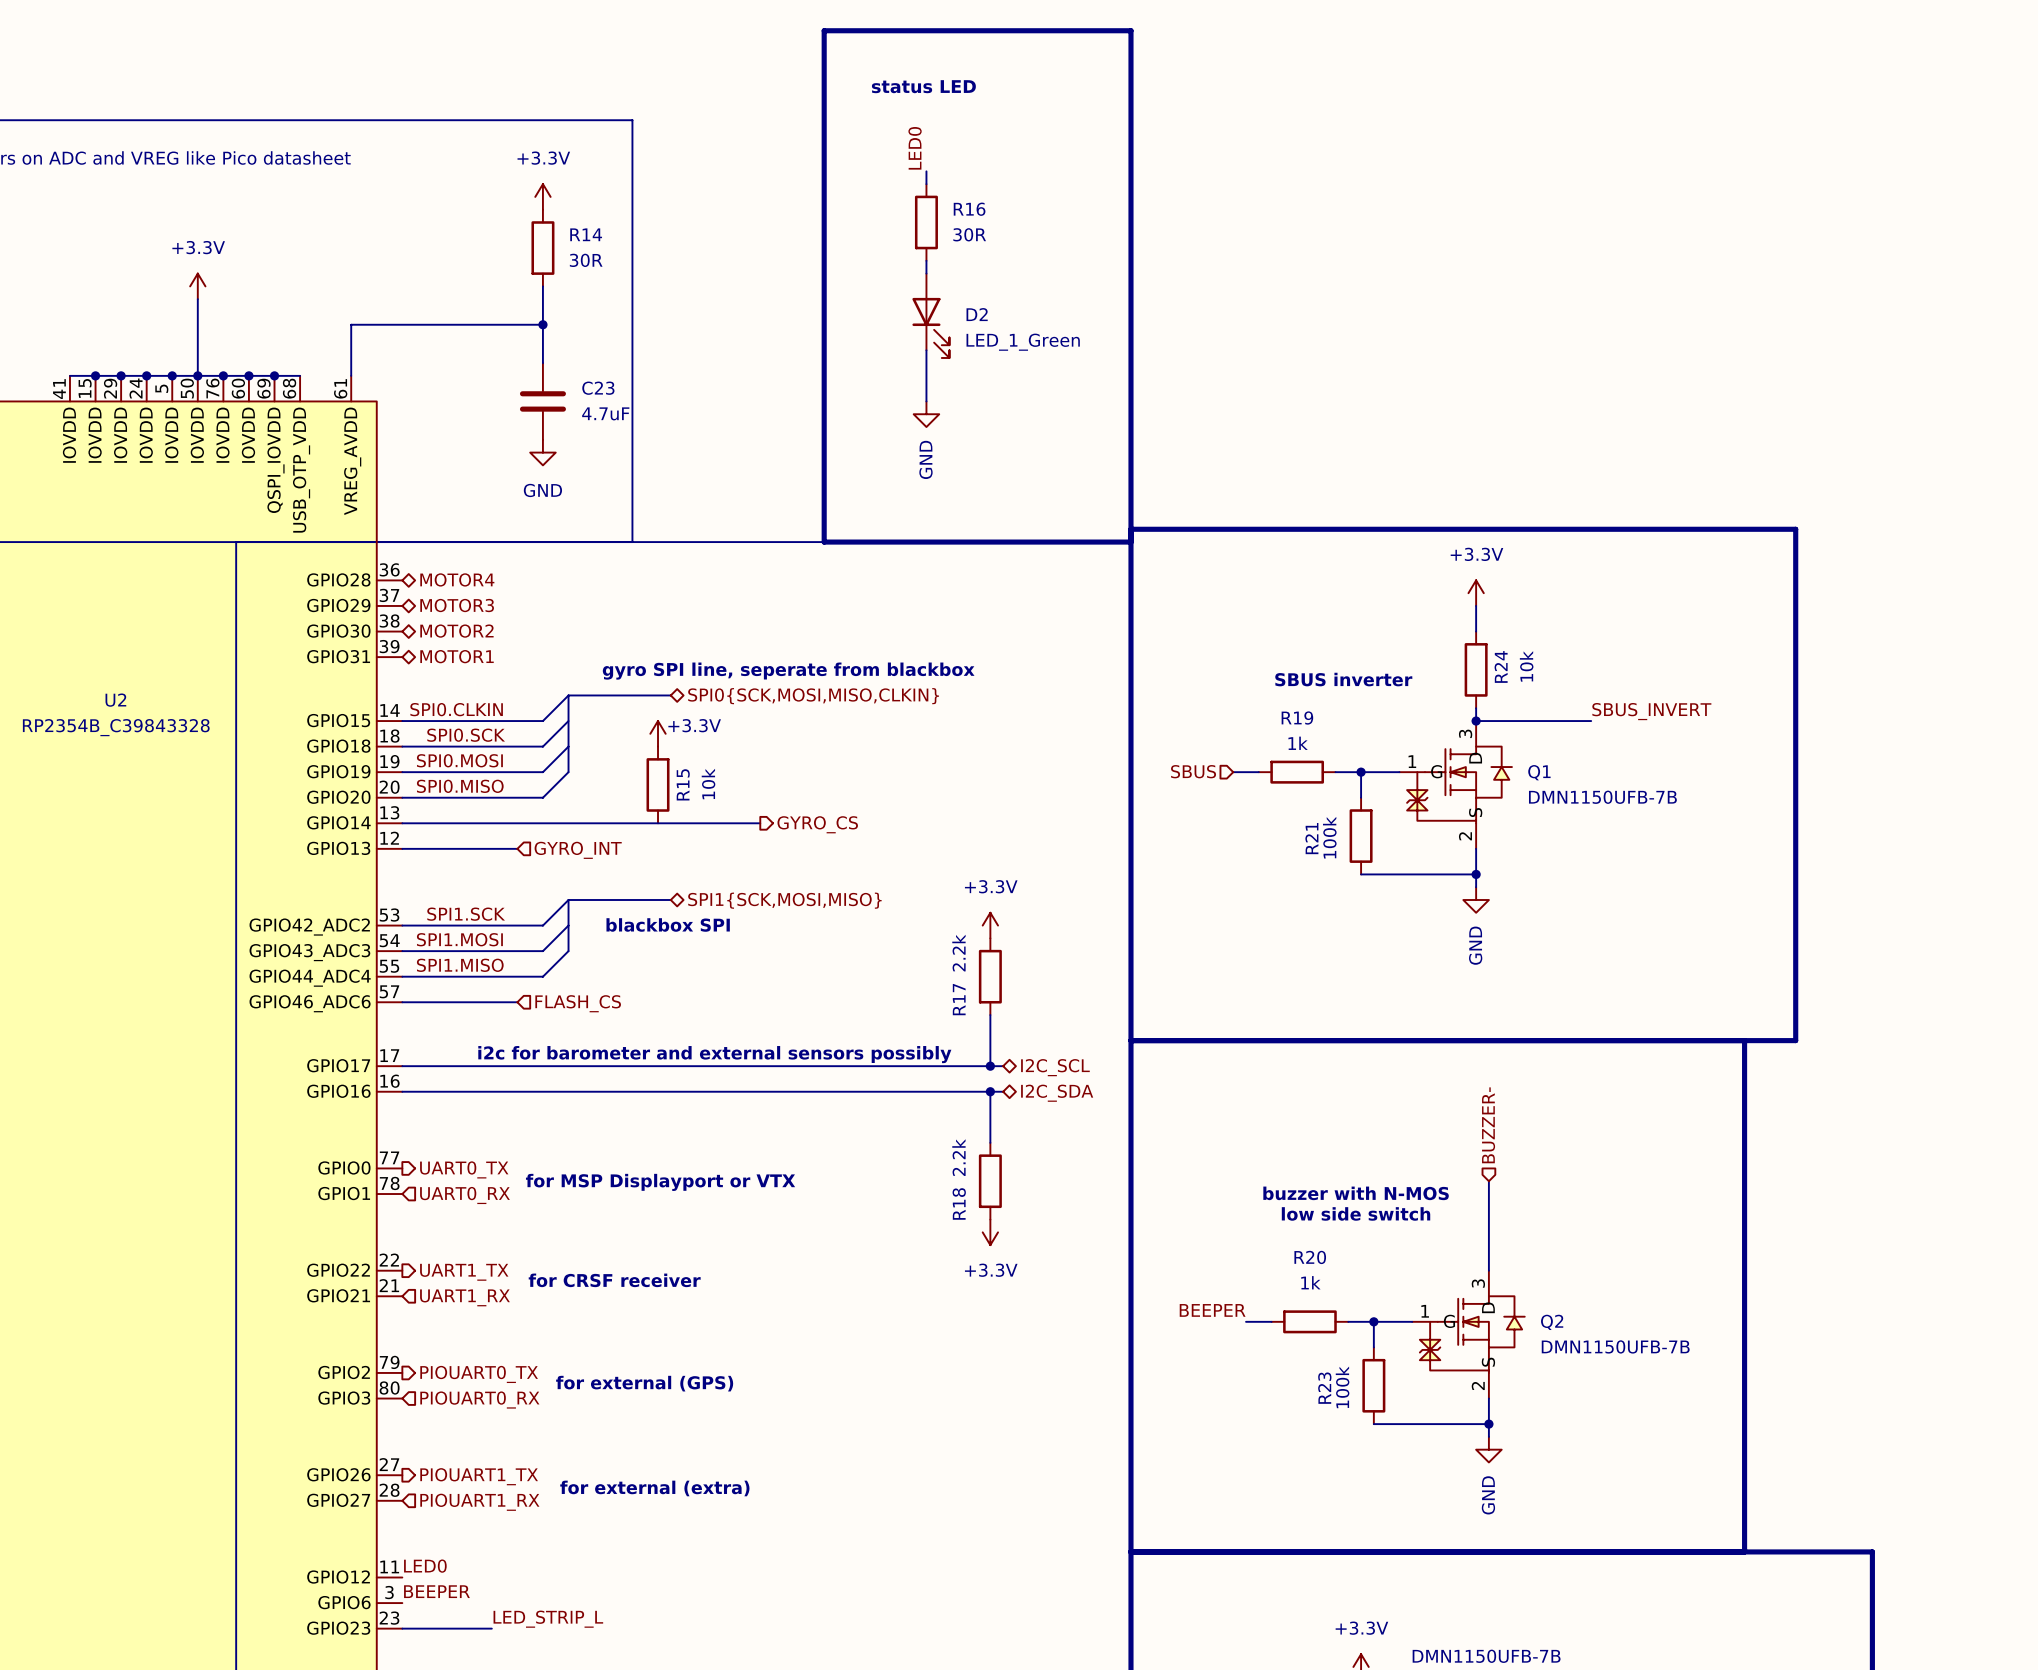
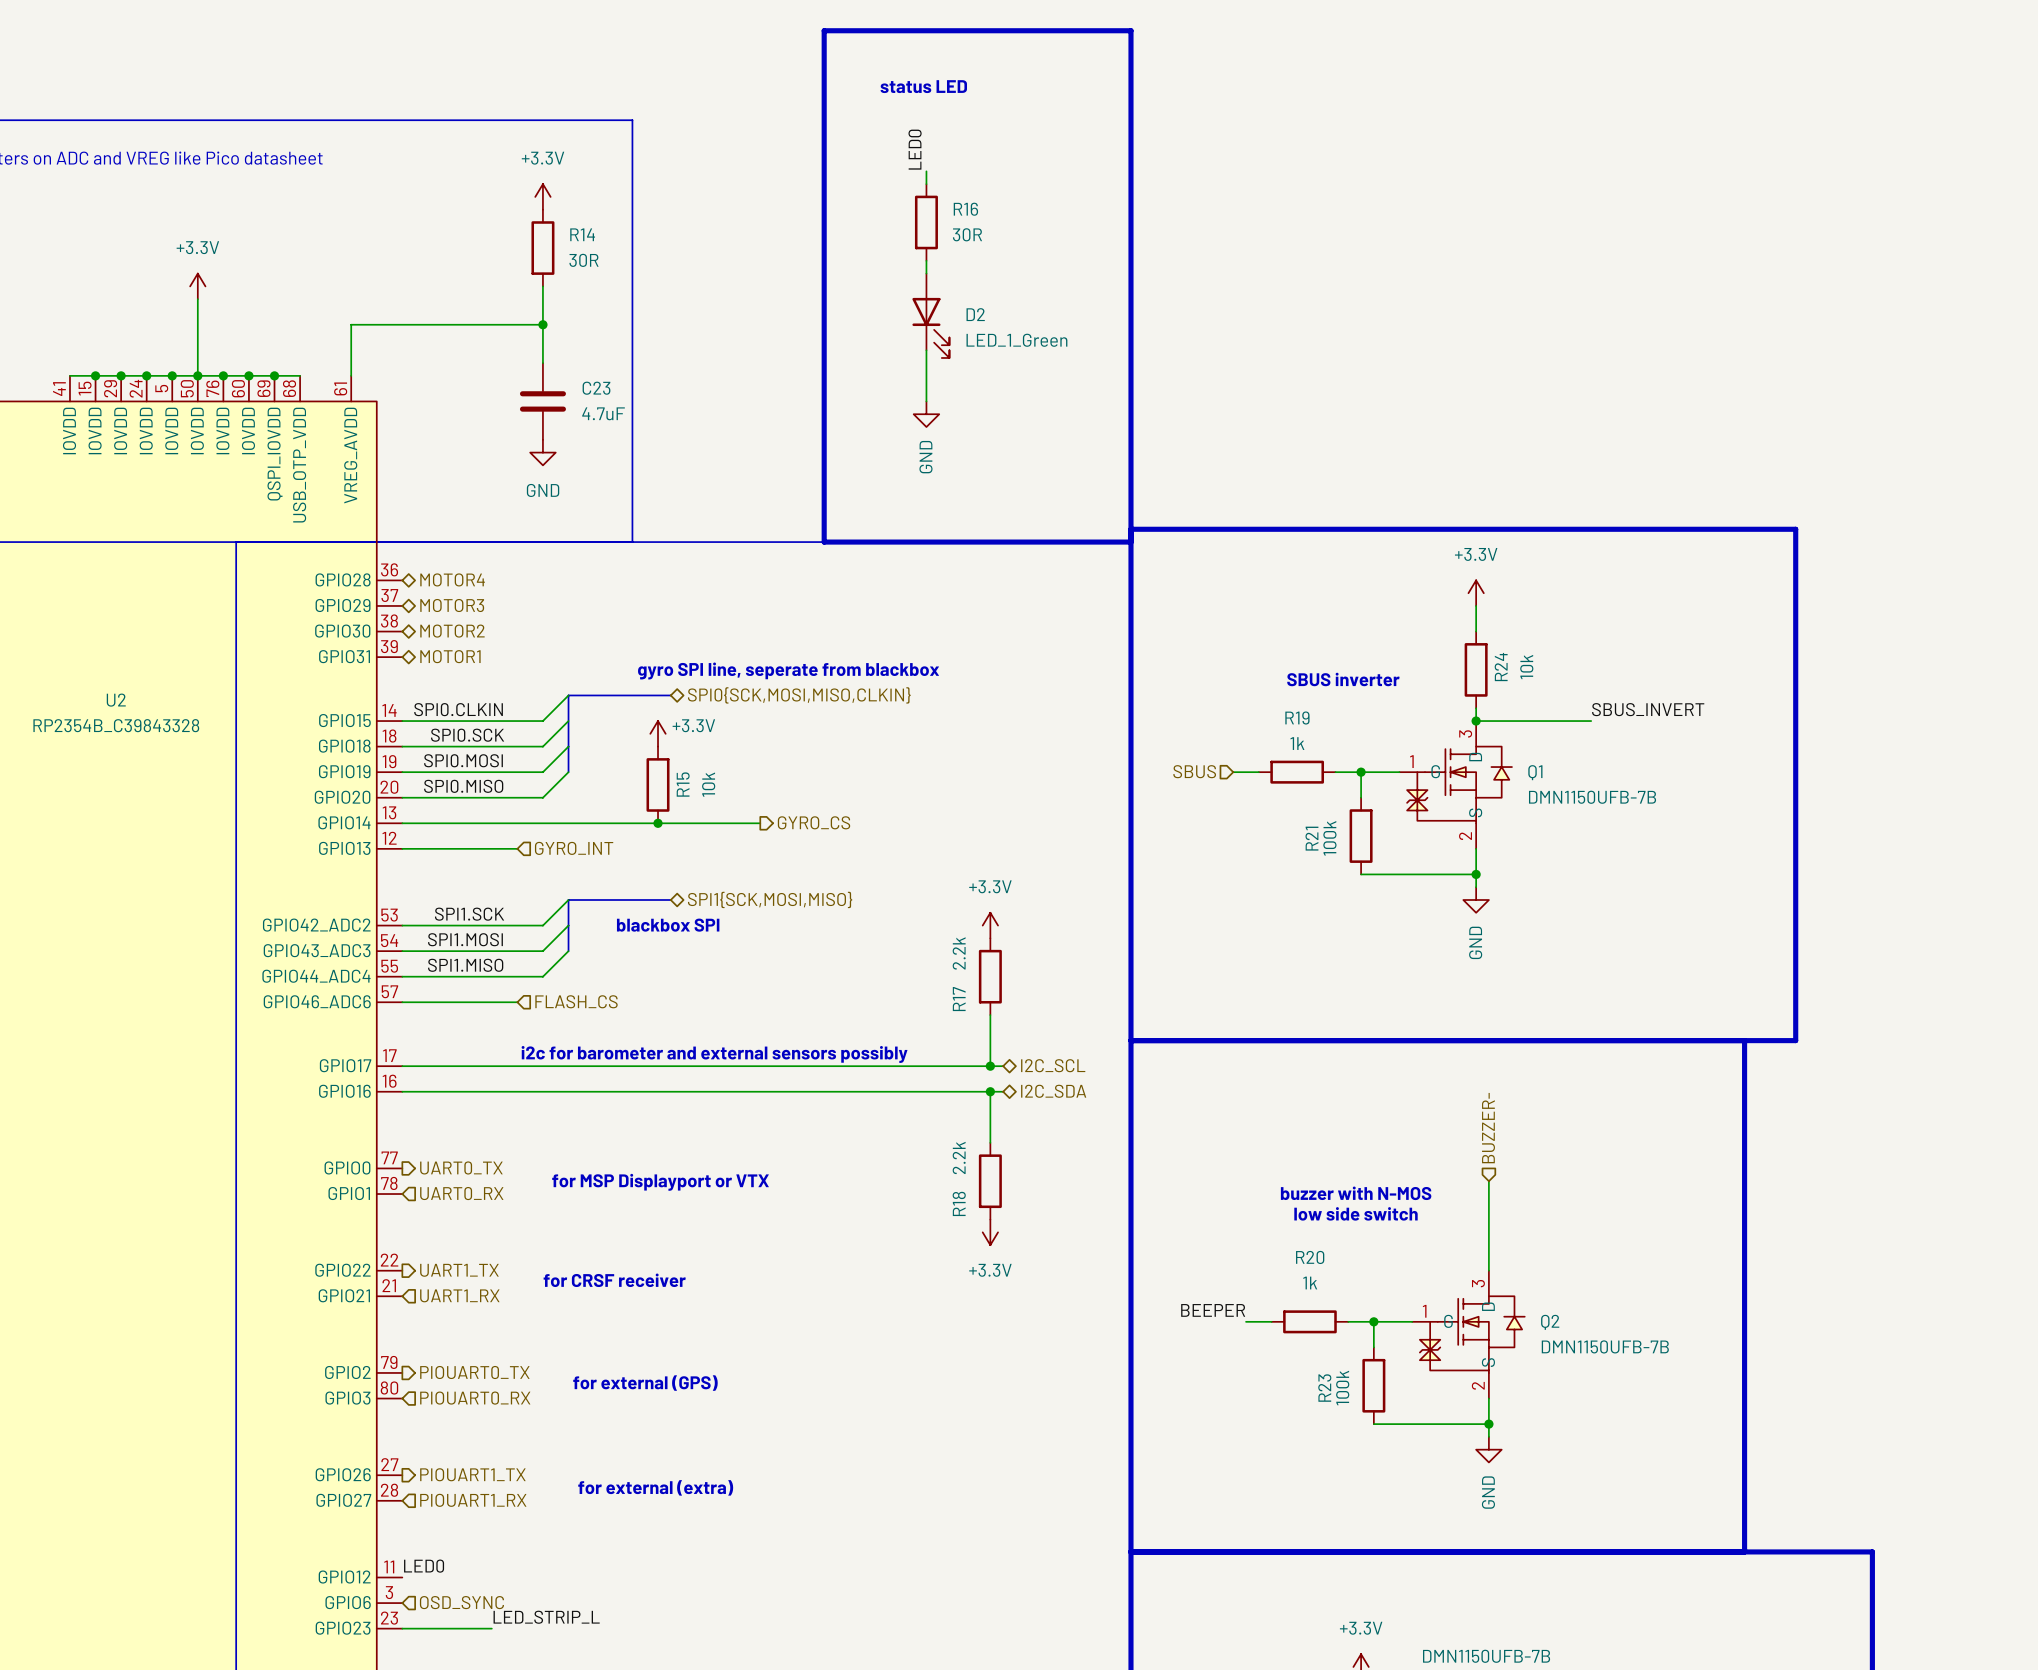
junction: none -> (658, 823)
label: BEEPER (436, 1591) -> none
hierarchical label: none -> OSD_SYNC (461, 1602)

